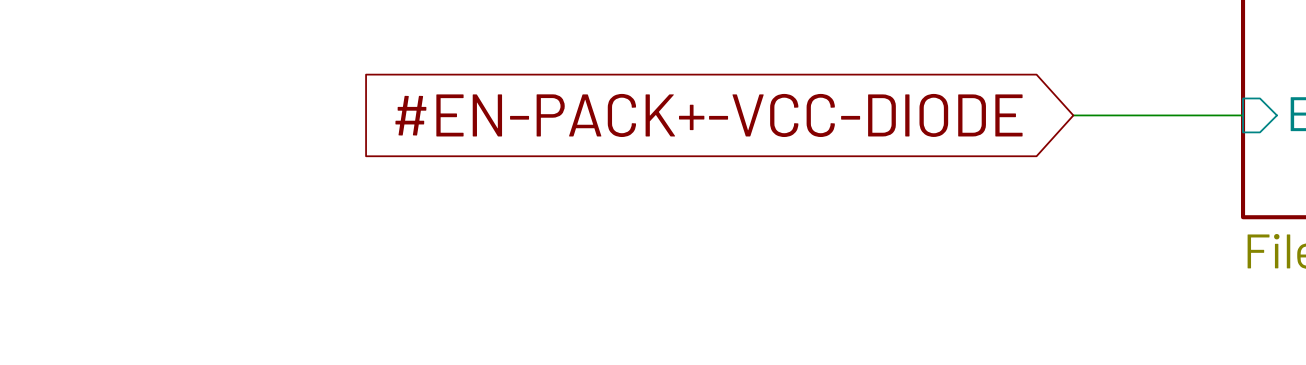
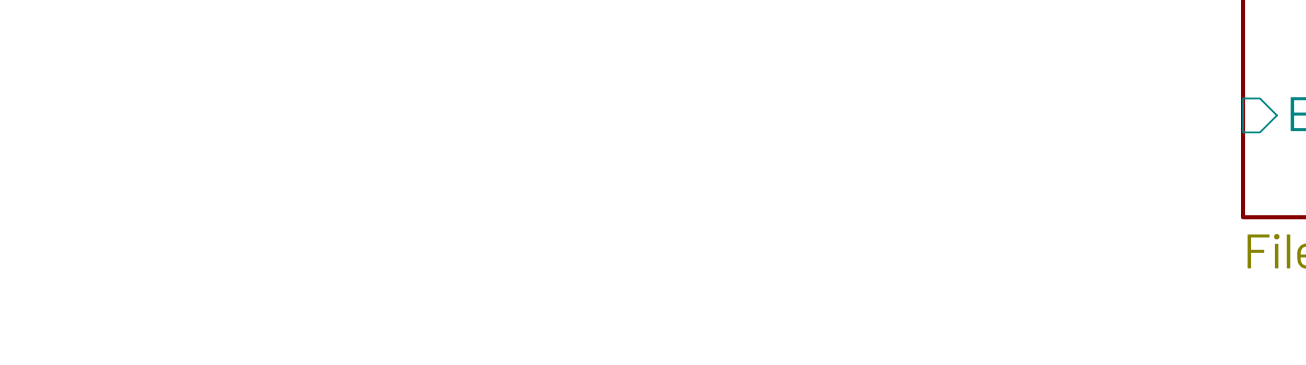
global label: #EN-PACK+-VCC-DIODE (709, 115) -> none
wire: (1073, 115) (1243, 115) -> none

